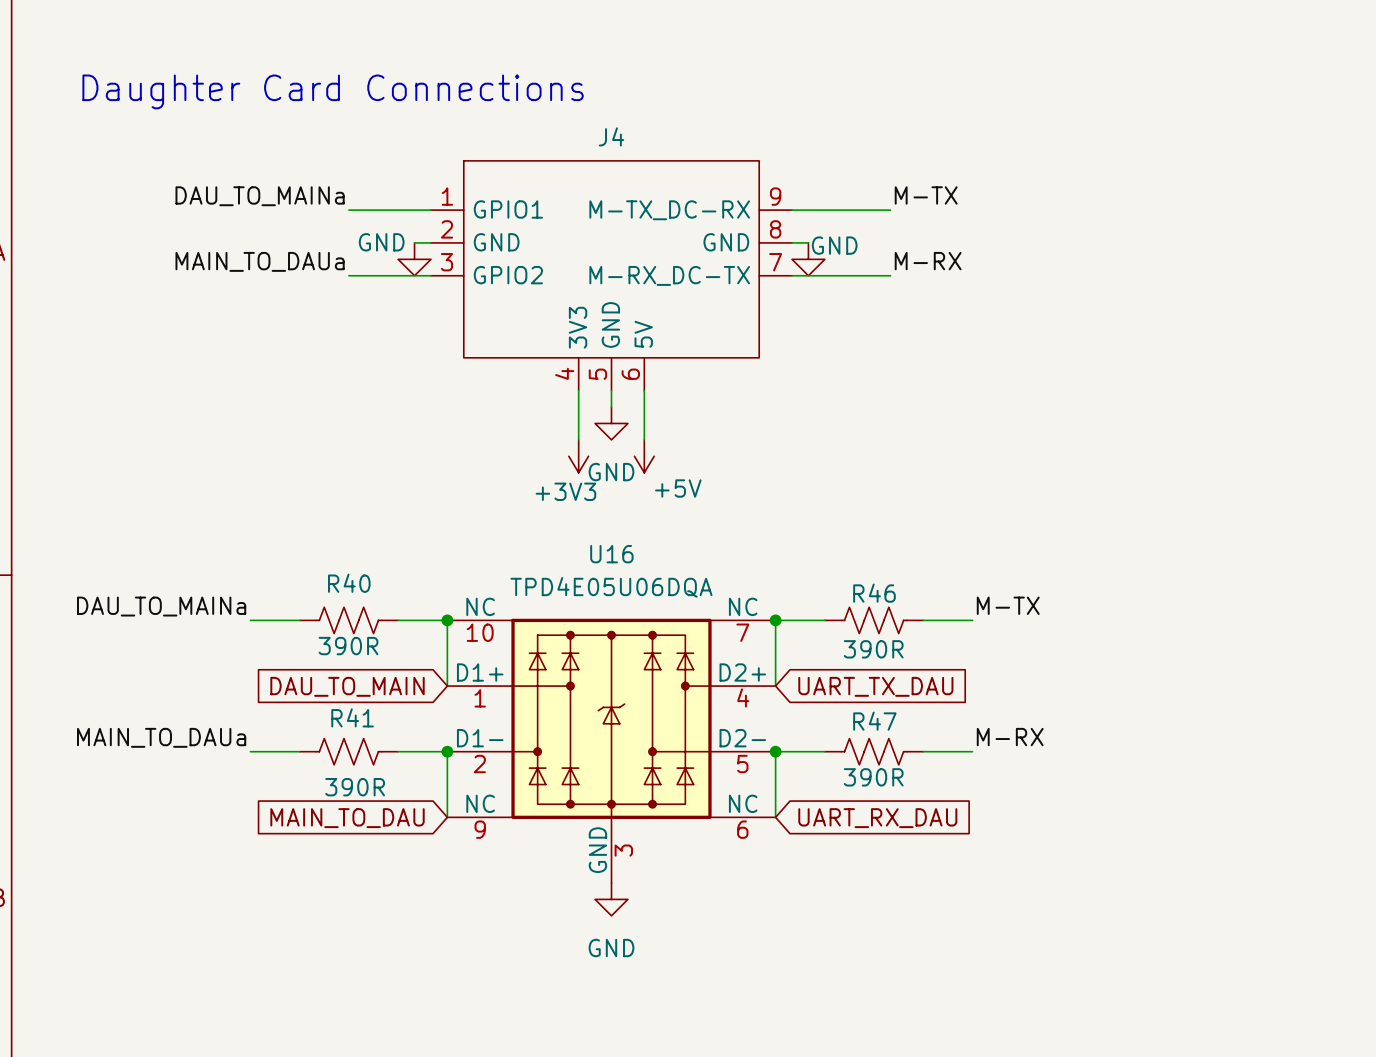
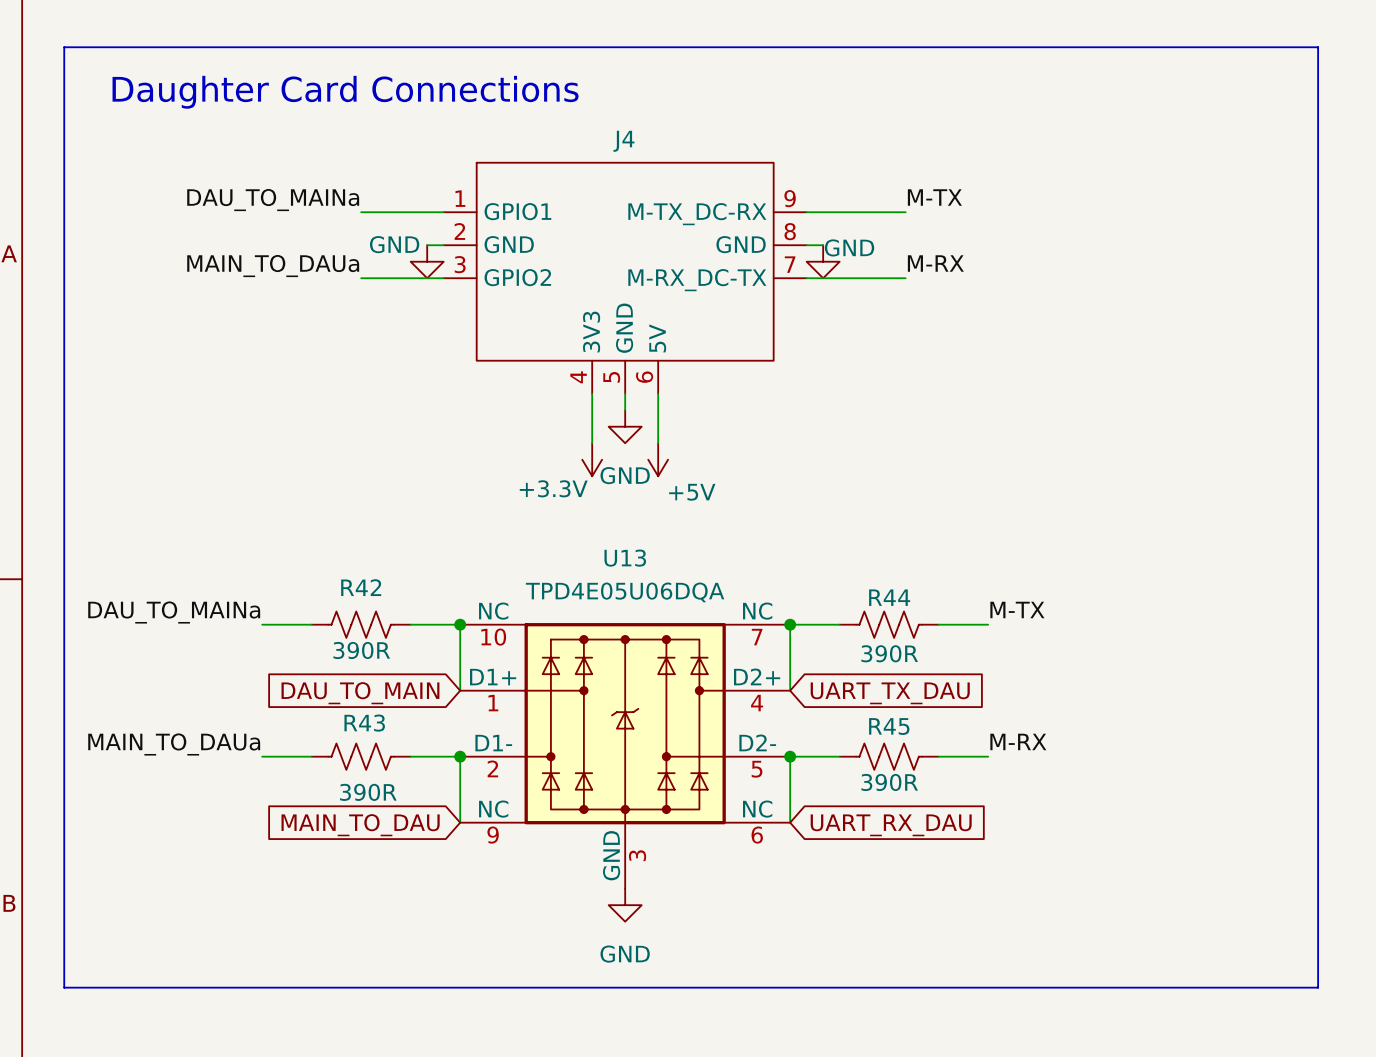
line: none -> (64, 47) (1318, 47) (1318, 987) (64, 987) (64, 47)
power symbol: +3V3 (578, 456) -> +3.3V (592, 459)
U16 name: U16 (611, 554) -> U13 (625, 558)
R40 name: R40 (349, 583) -> R42 (361, 587)
R46 name: R46 (874, 593) -> R44 (889, 597)
R41 name: R41 (352, 717) -> R43 (364, 723)
R47 name: R47 (874, 721) -> R45 (889, 726)

